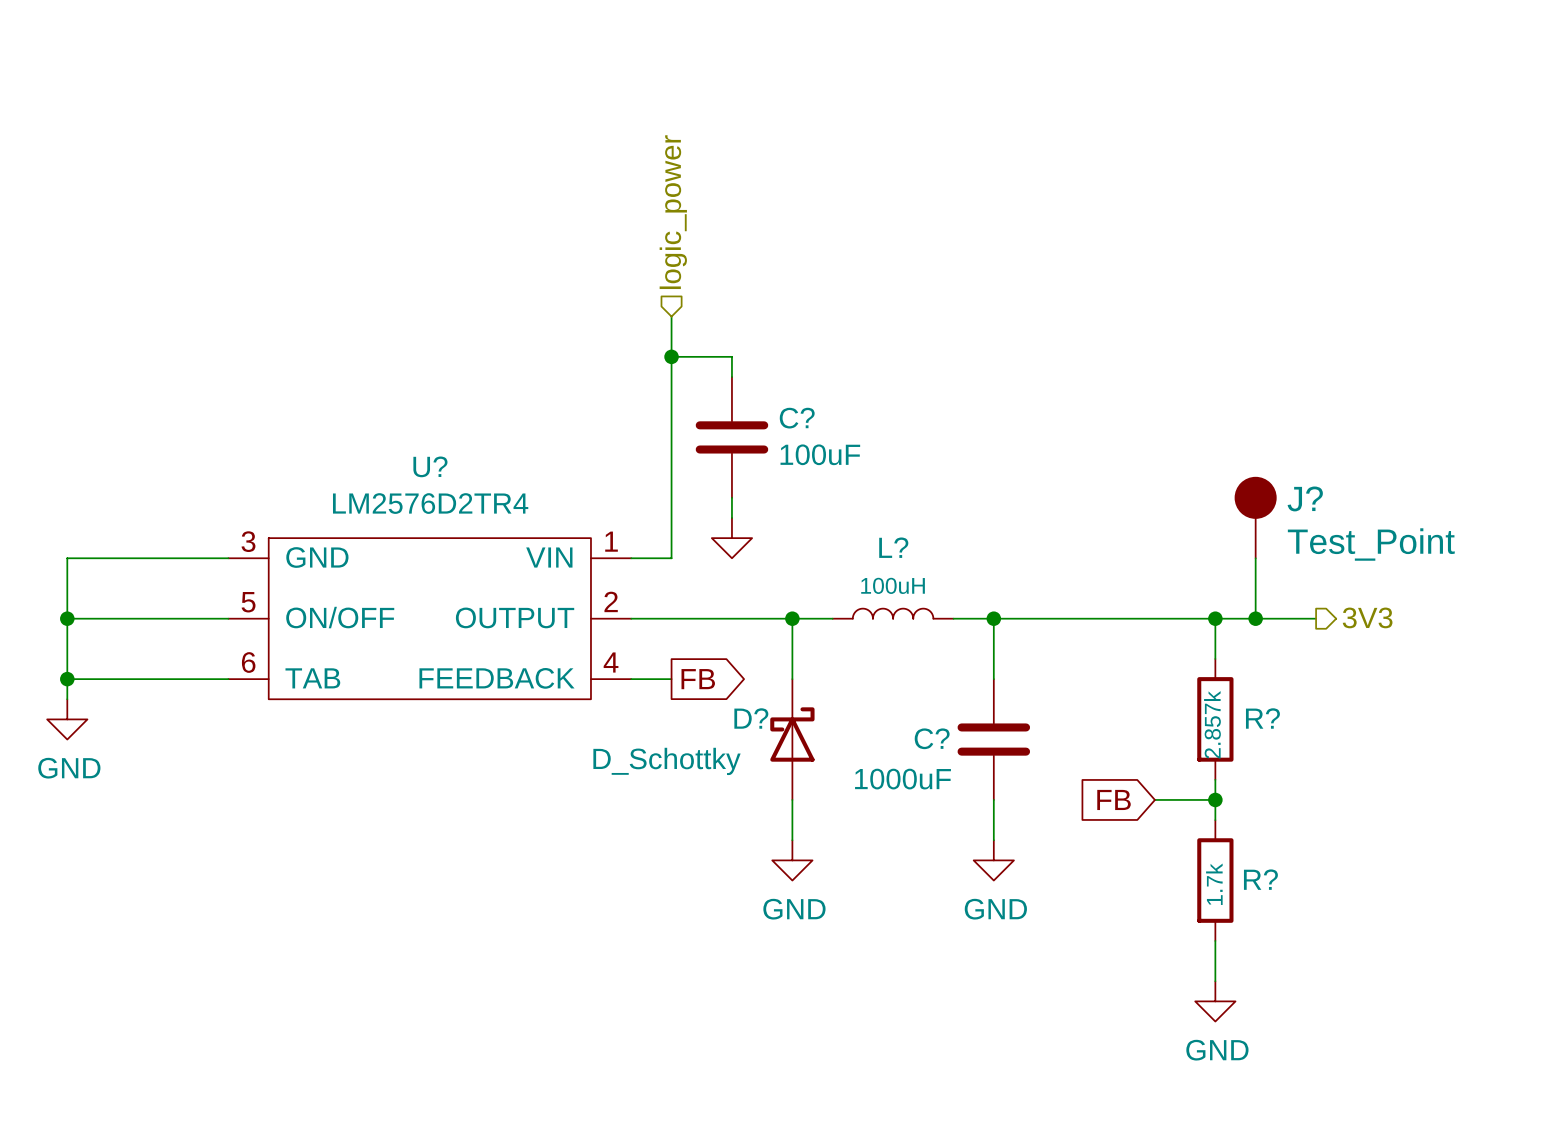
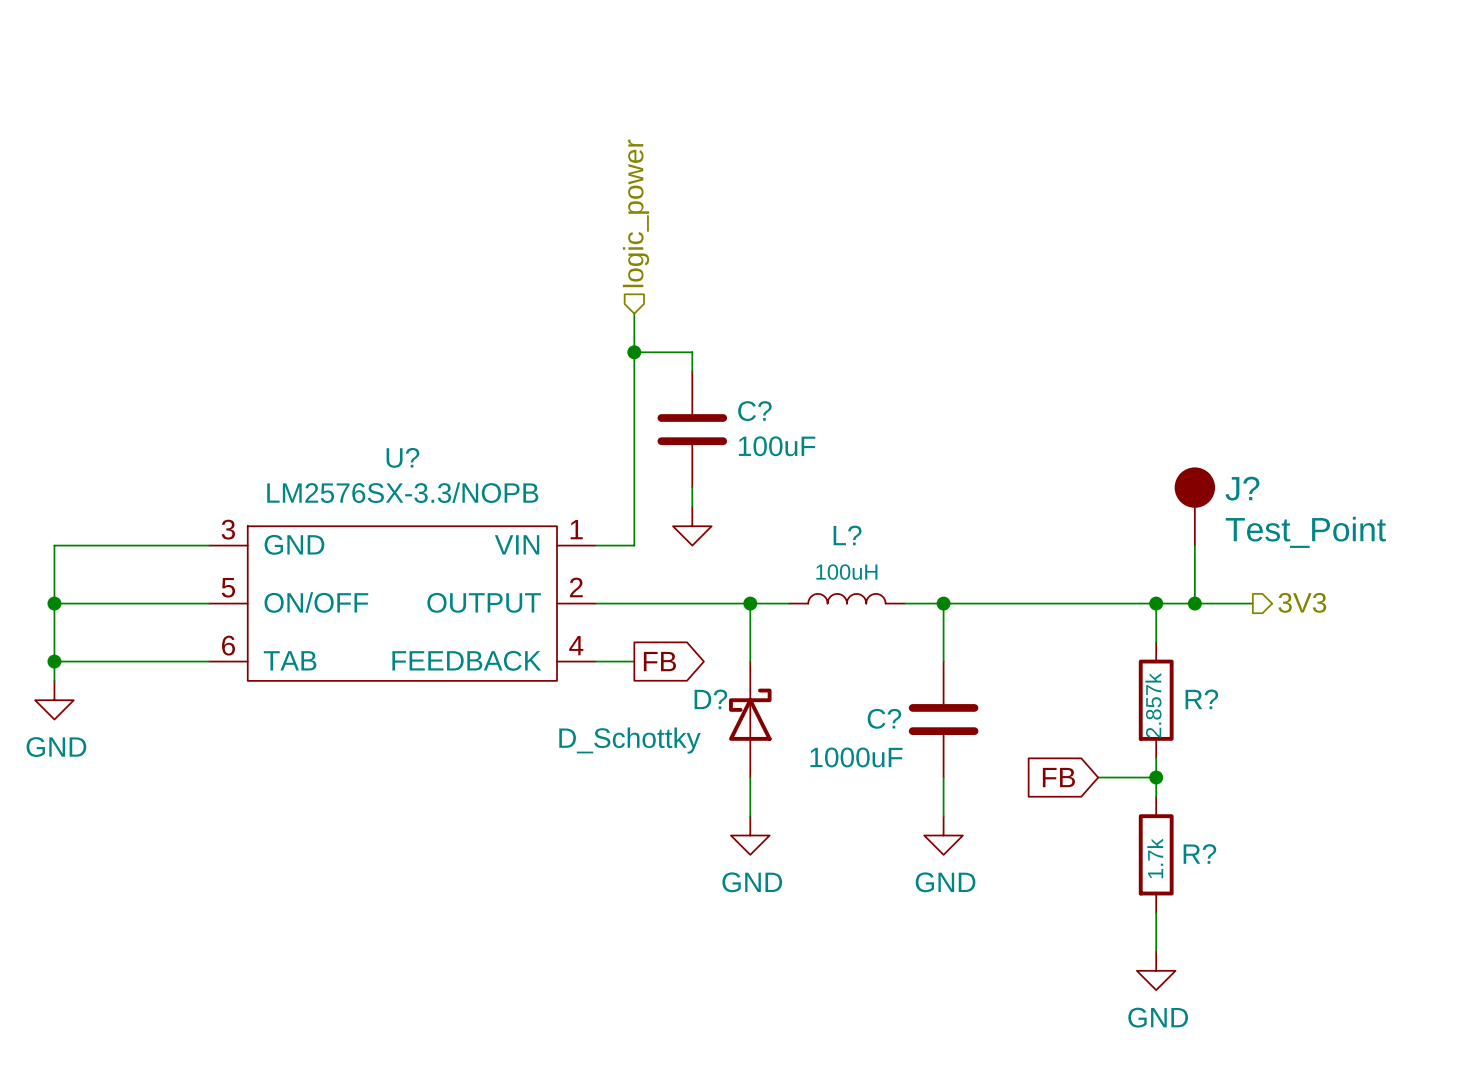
U? value: LM2576D2TR4 (430, 503) -> LM2576SX-3.3/NOPB (402, 492)

